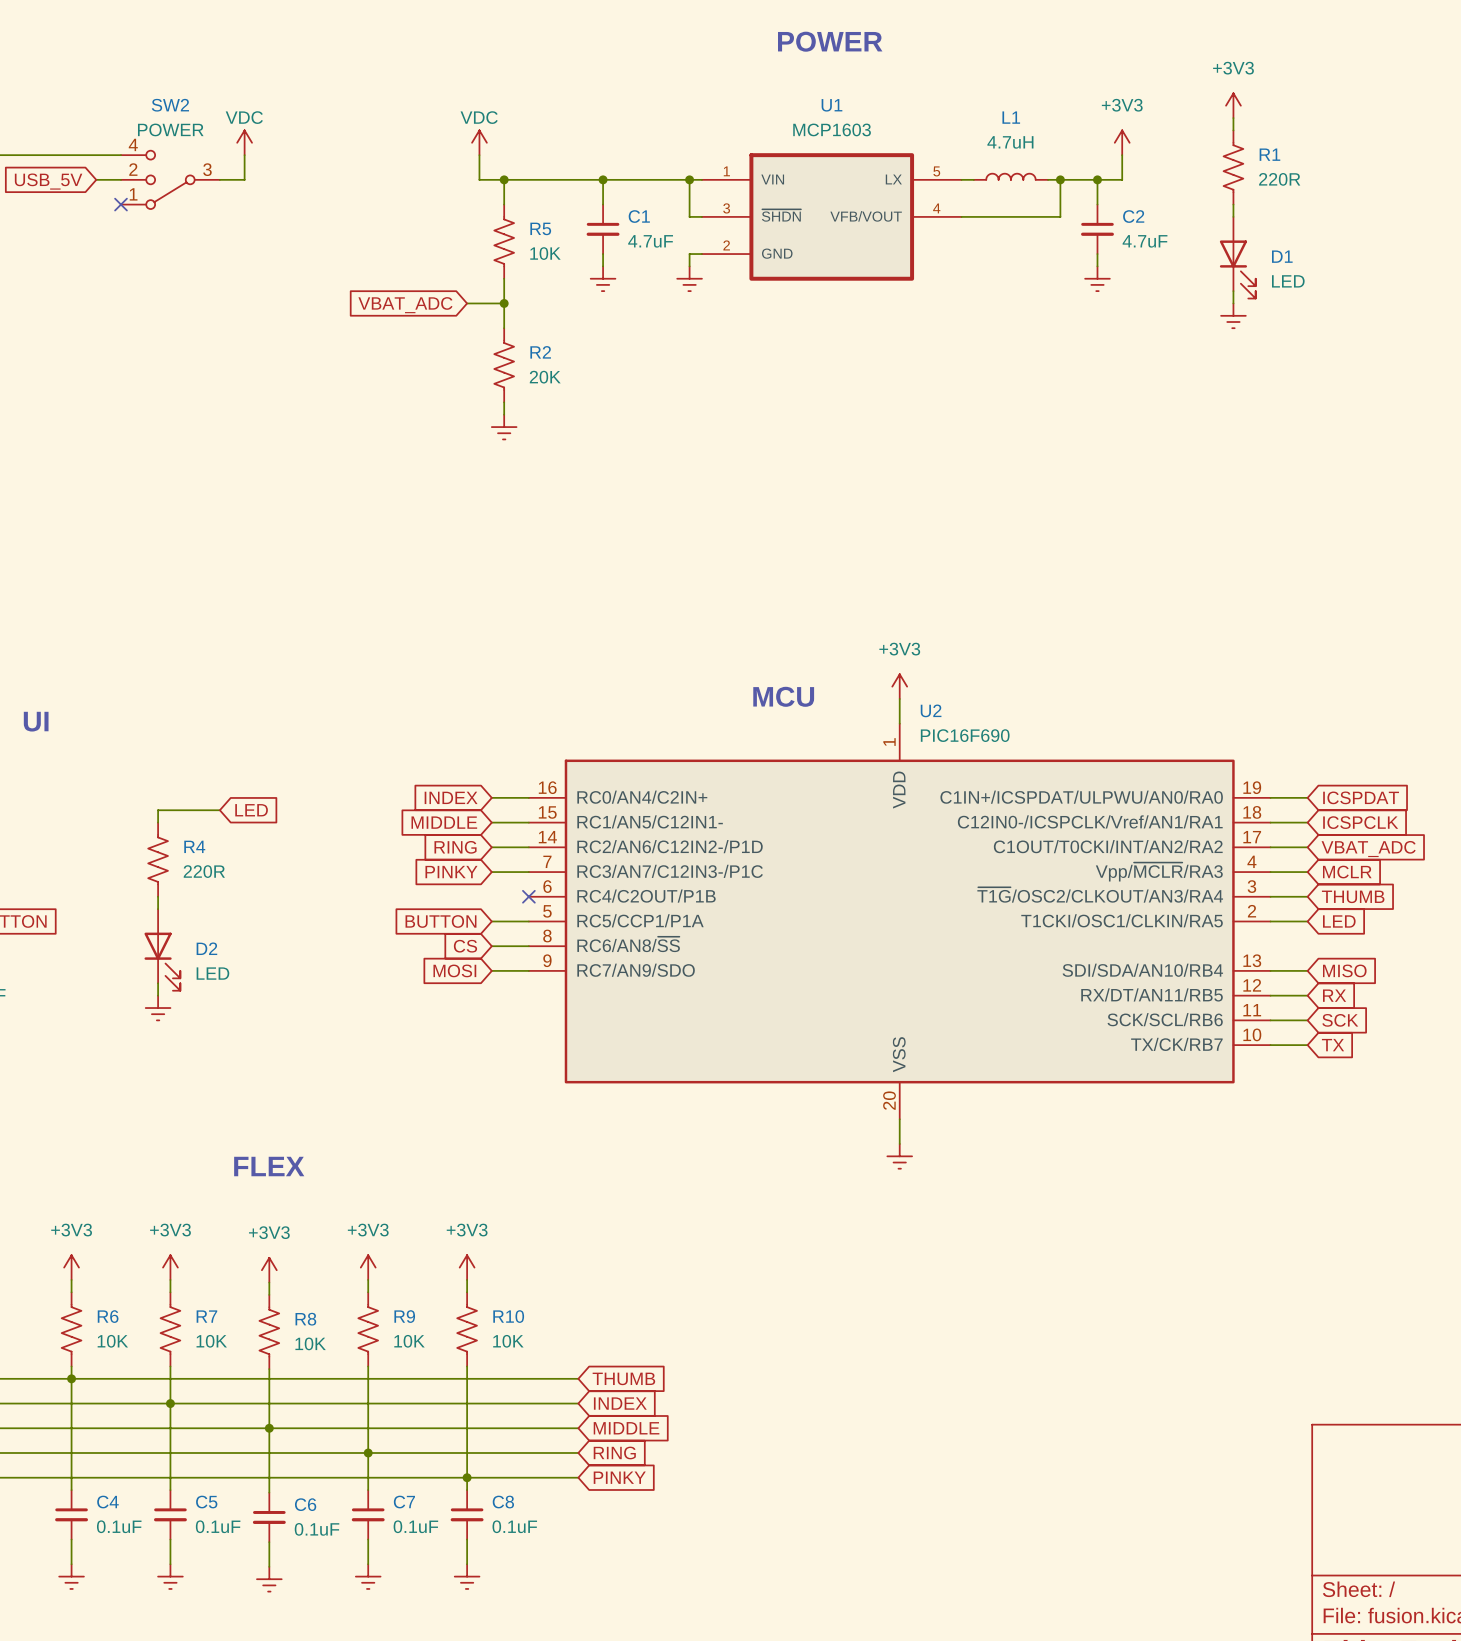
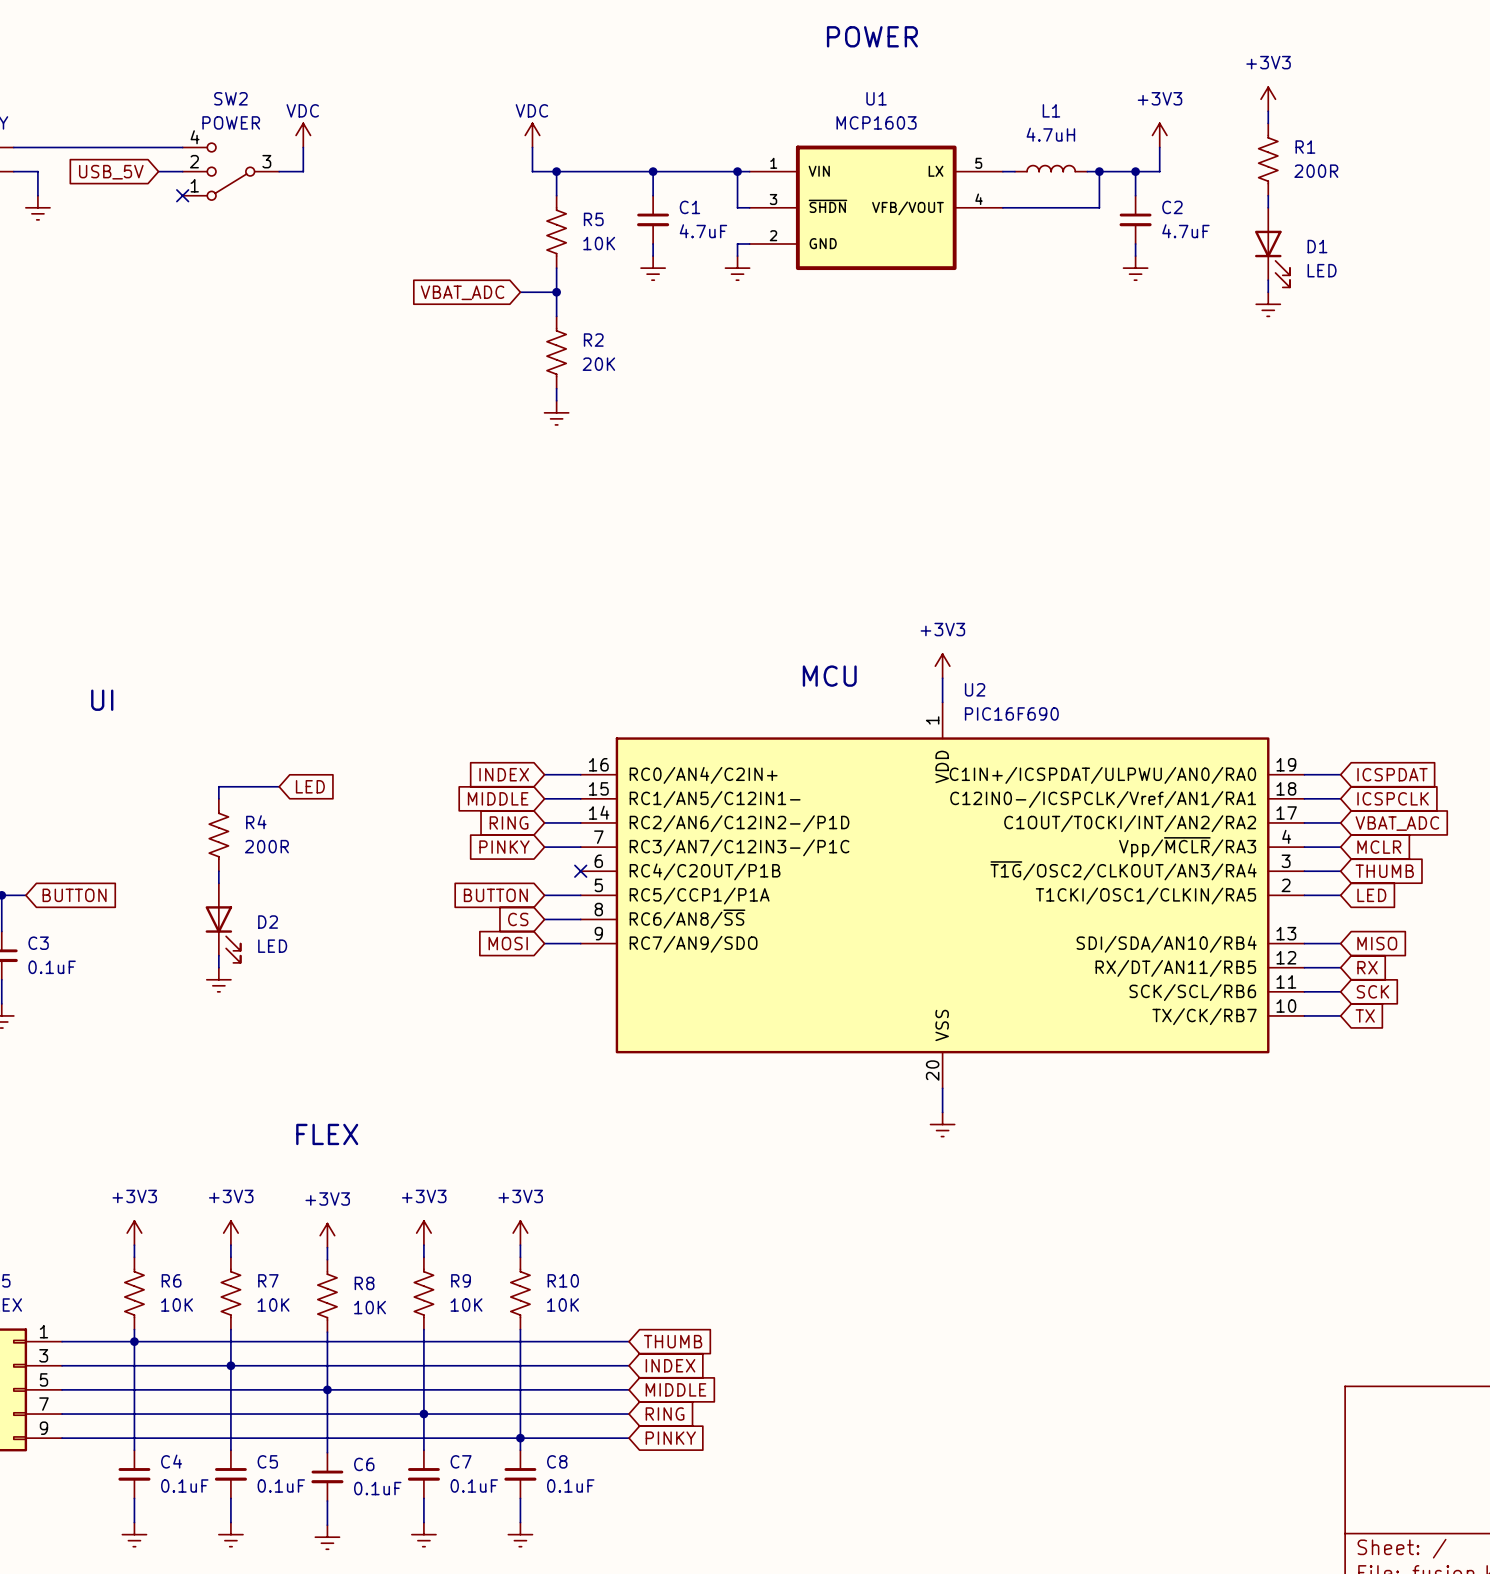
R1 value: 220R (1279, 179) -> 200R (1316, 171)
R4 value: 220R (204, 871) -> 200R (266, 846)

